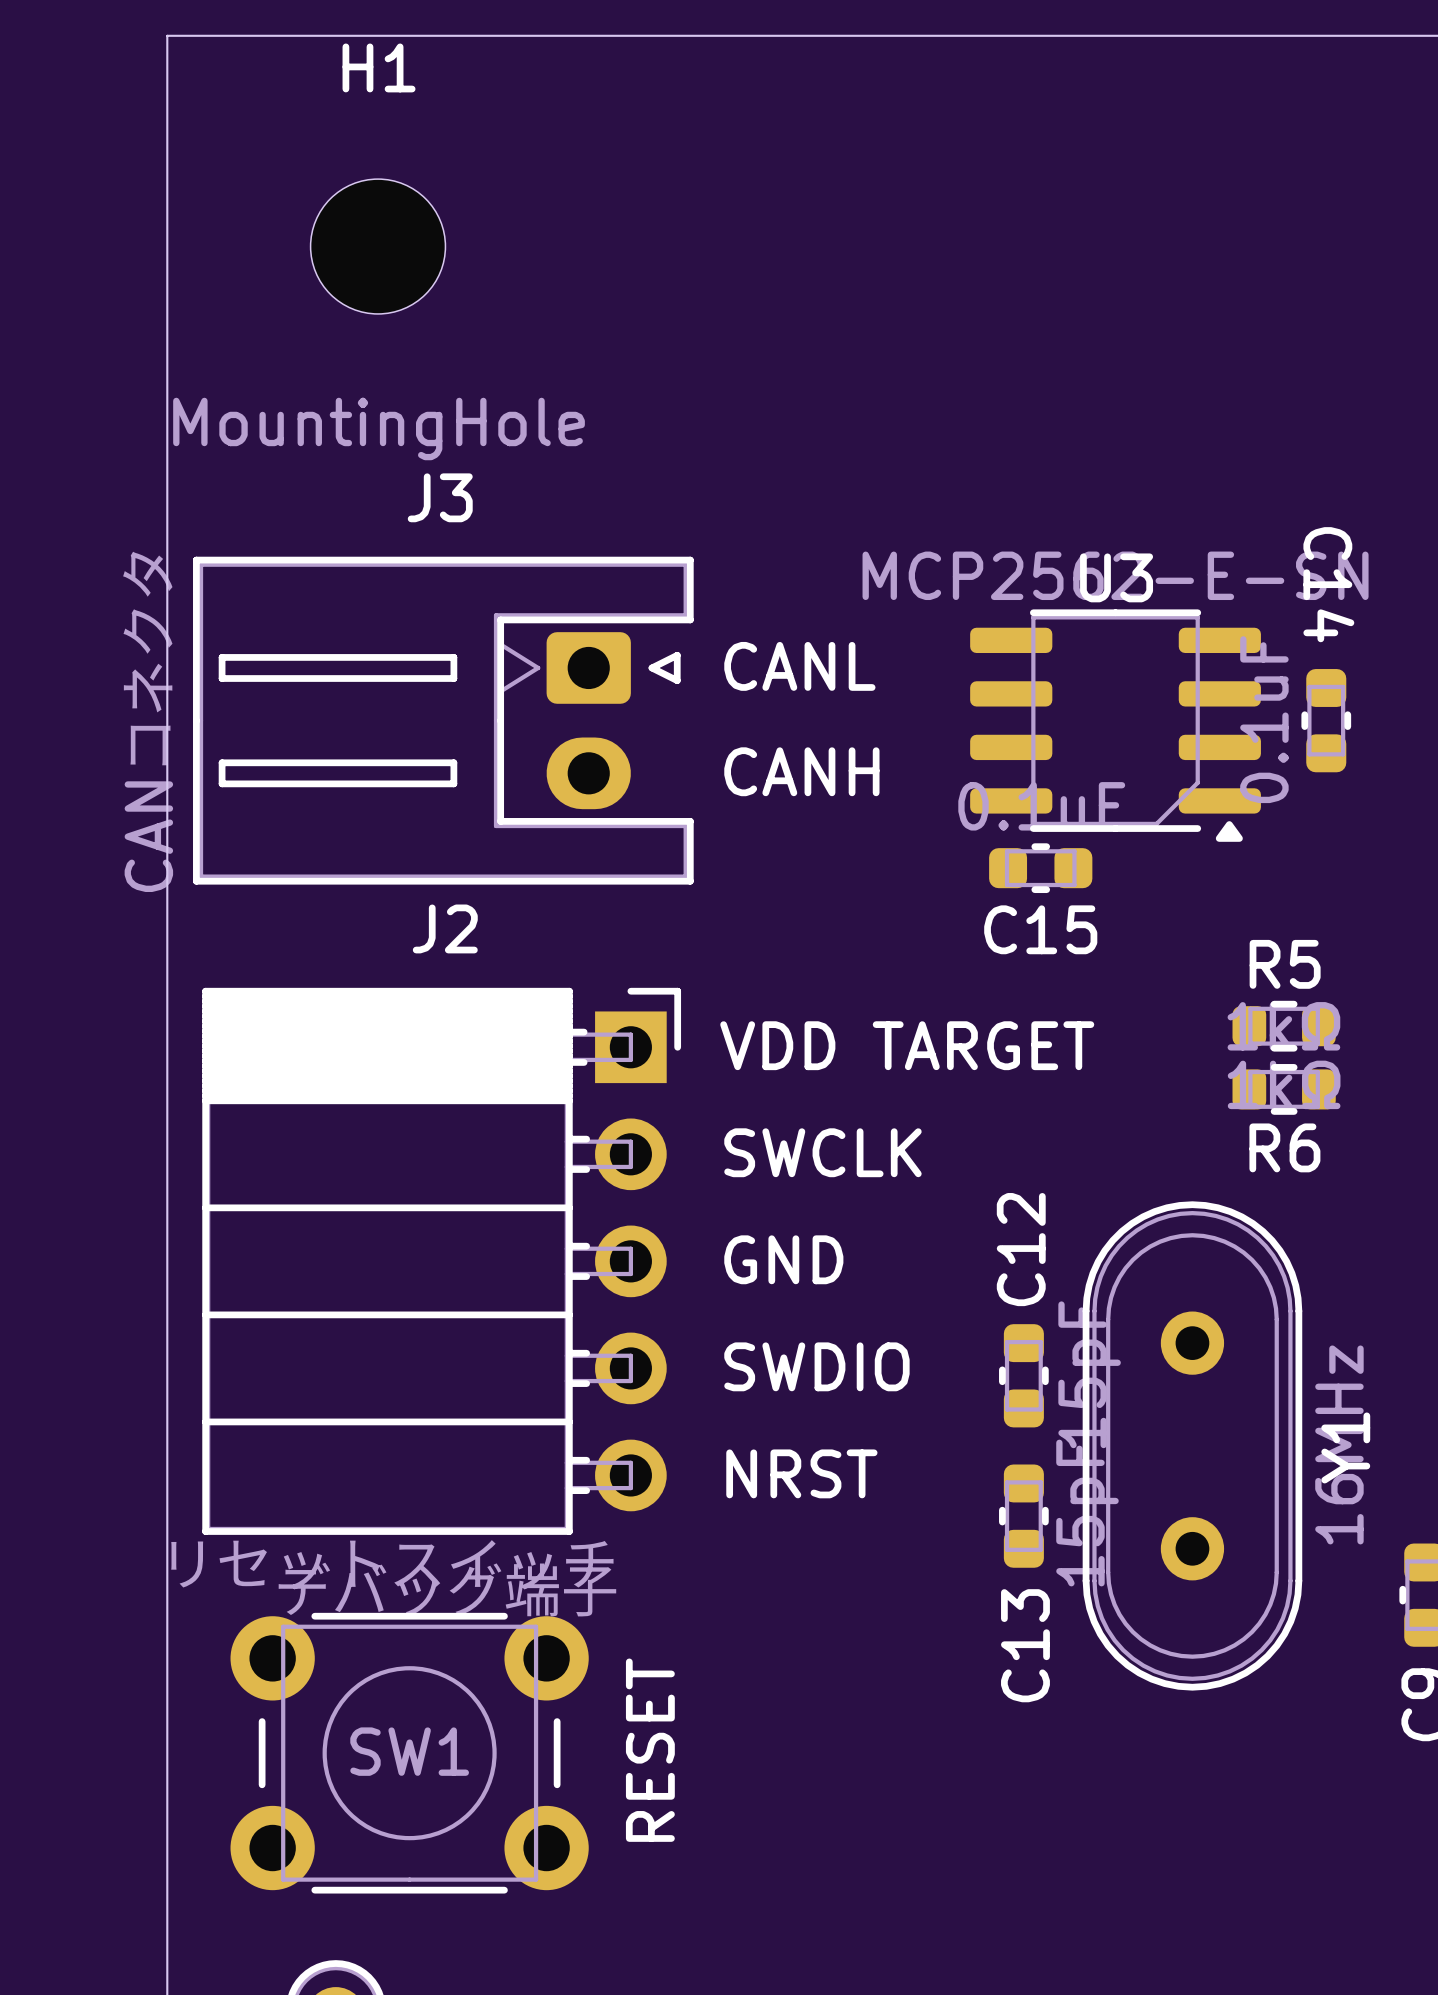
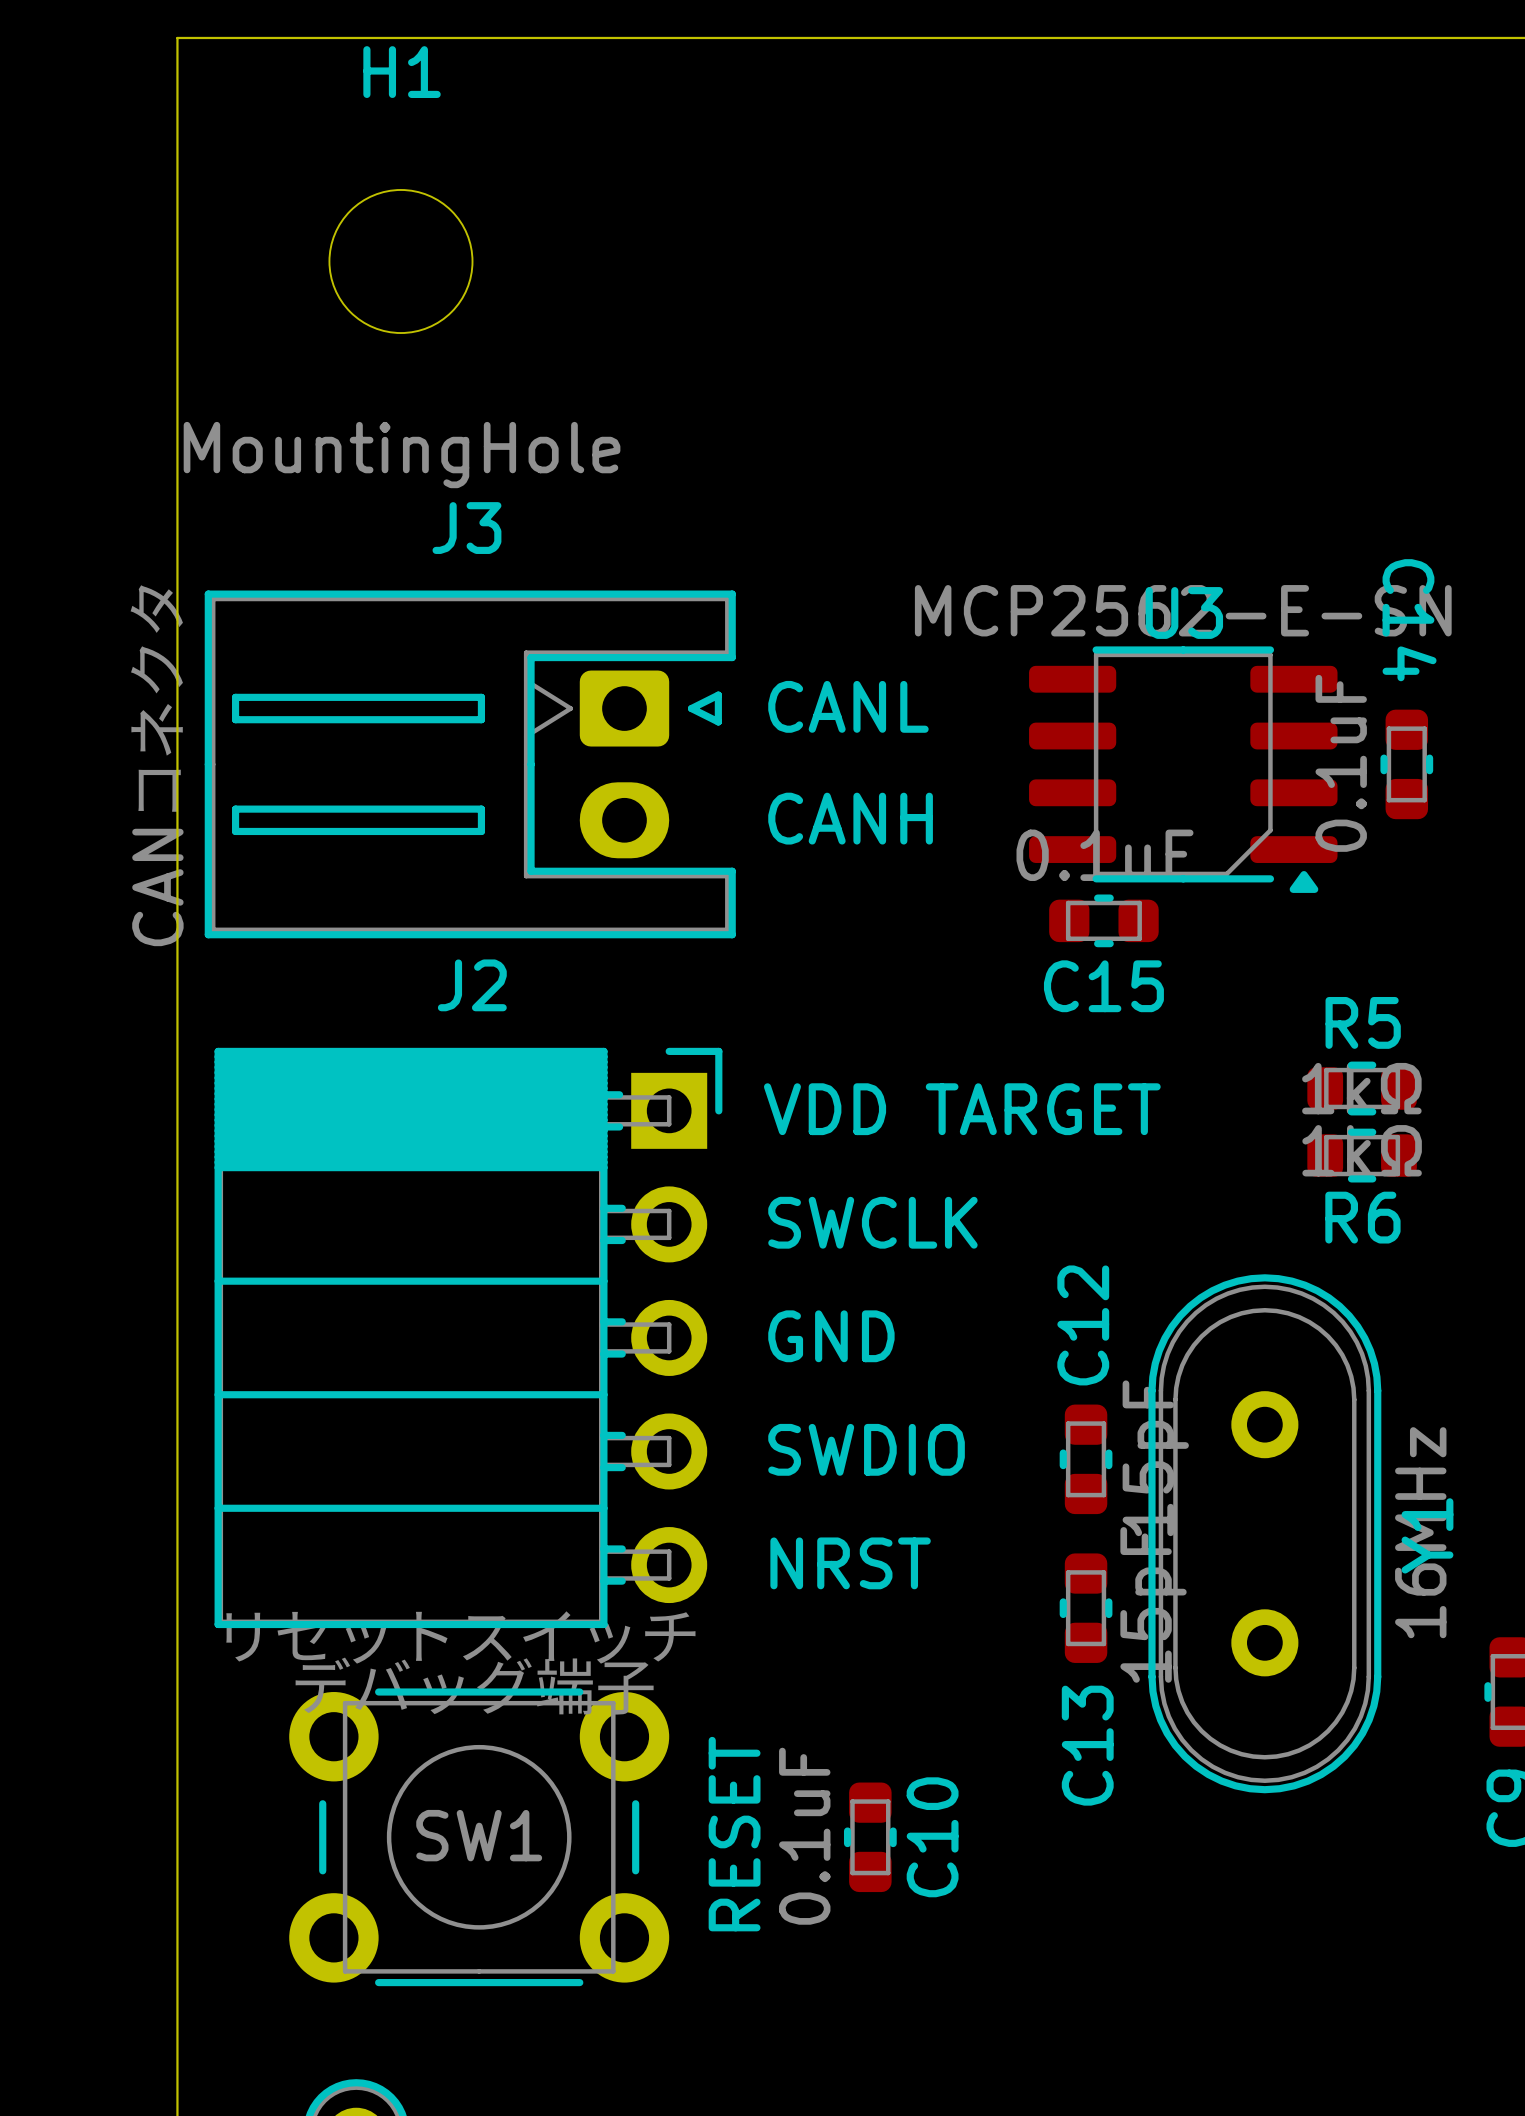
C10: none -> 0.1uF (870, 1837)
text position: RESET (650, 1750) -> RESET (734, 1834)
SW1 position: (409, 1753) -> (479, 1837)

